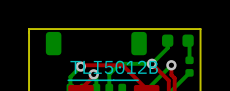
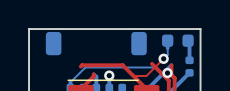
bottom track: (167, 48) (151, 63) (119, 63) (109, 75) -> (167, 48) (167, 54) (163, 58)
top track: none -> (163, 58) (146, 75) (134, 75)
via: none -> (163, 58)
via: (151, 63) -> none
via: (171, 65) -> none
bottom track: (80, 66) (70, 76) (70, 82) -> (167, 73) (160, 73) (154, 67) (85, 67) (70, 82)
via: (80, 66) -> none
text: TLI5012B (114, 67) -> none
via: none -> (167, 73)
via: (93, 74) -> none
via: none -> (109, 75)

